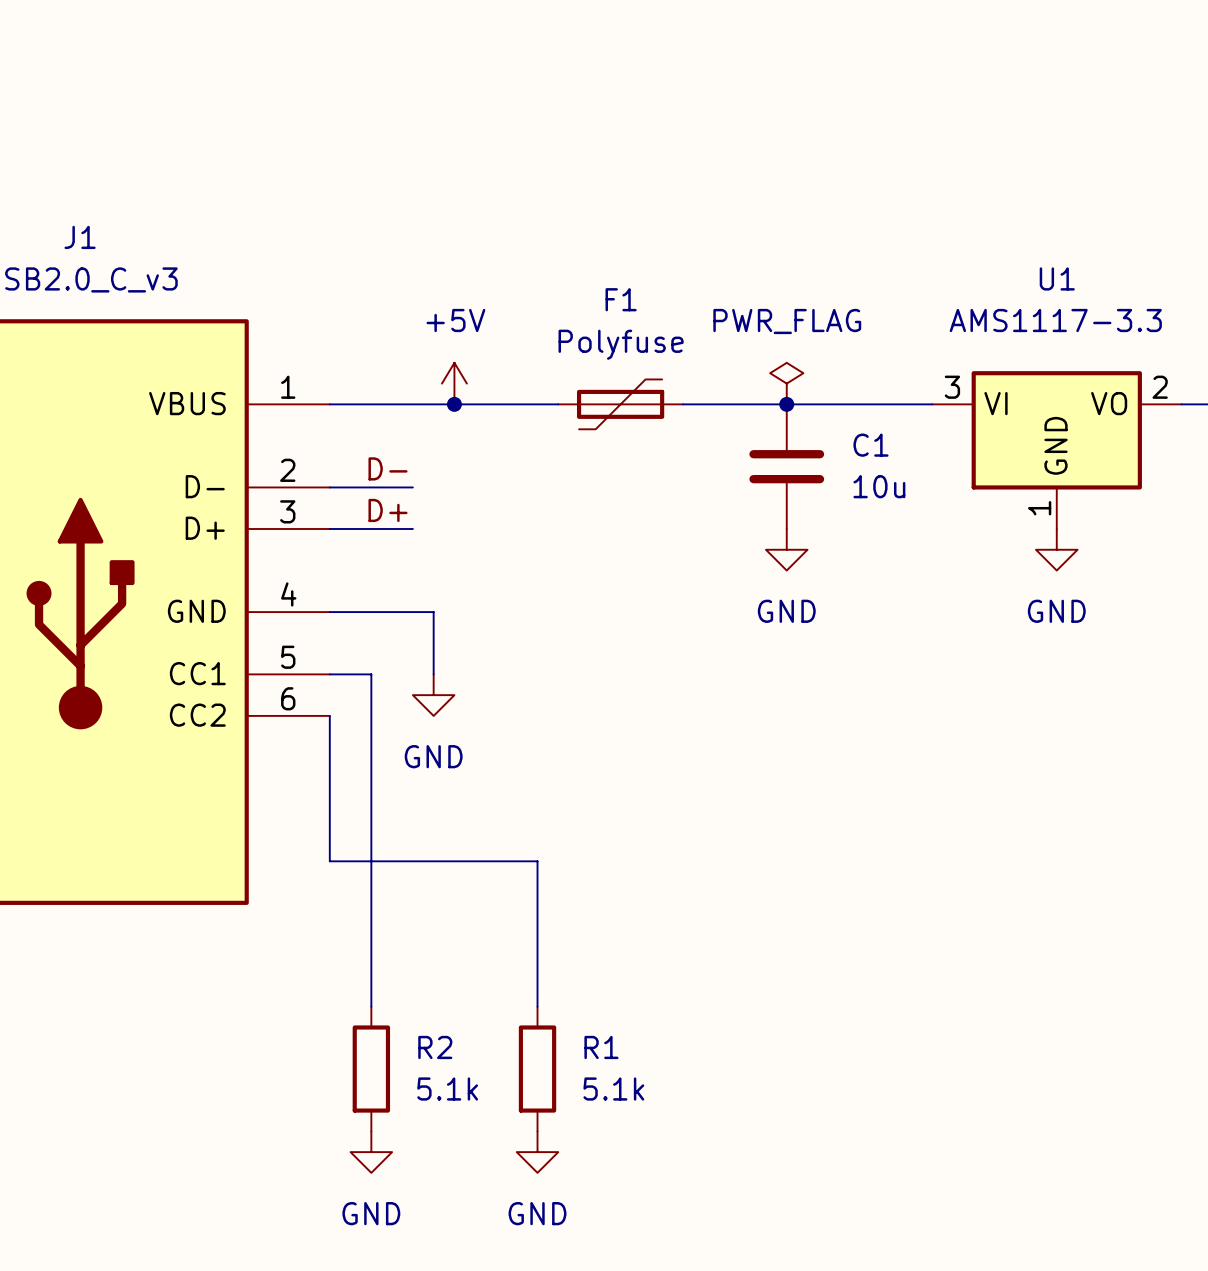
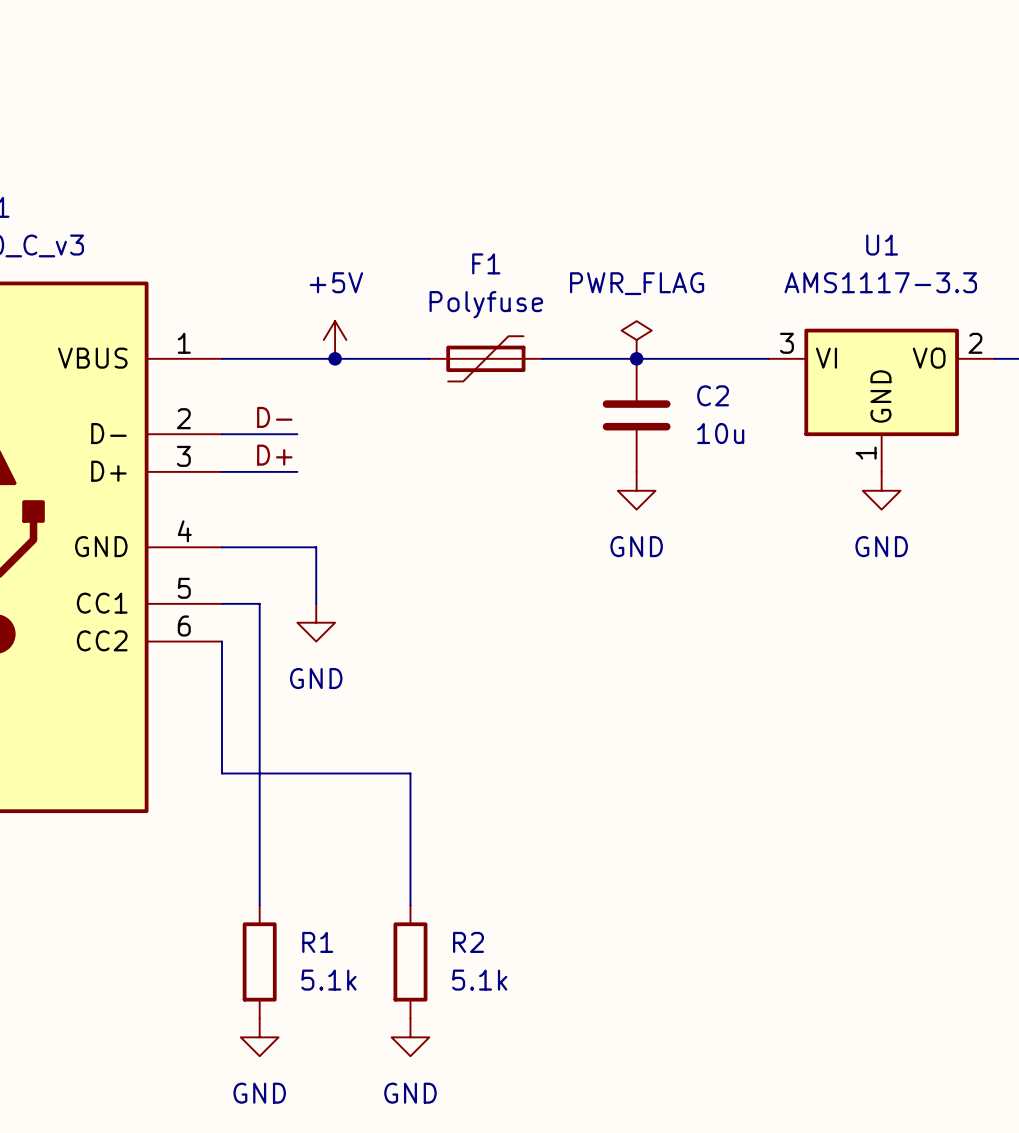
C1 name: C1 (870, 445) -> C2 (713, 395)
R2 name: R2 (435, 1047) -> R1 (317, 942)
R1 name: R1 (601, 1047) -> R2 (468, 942)

